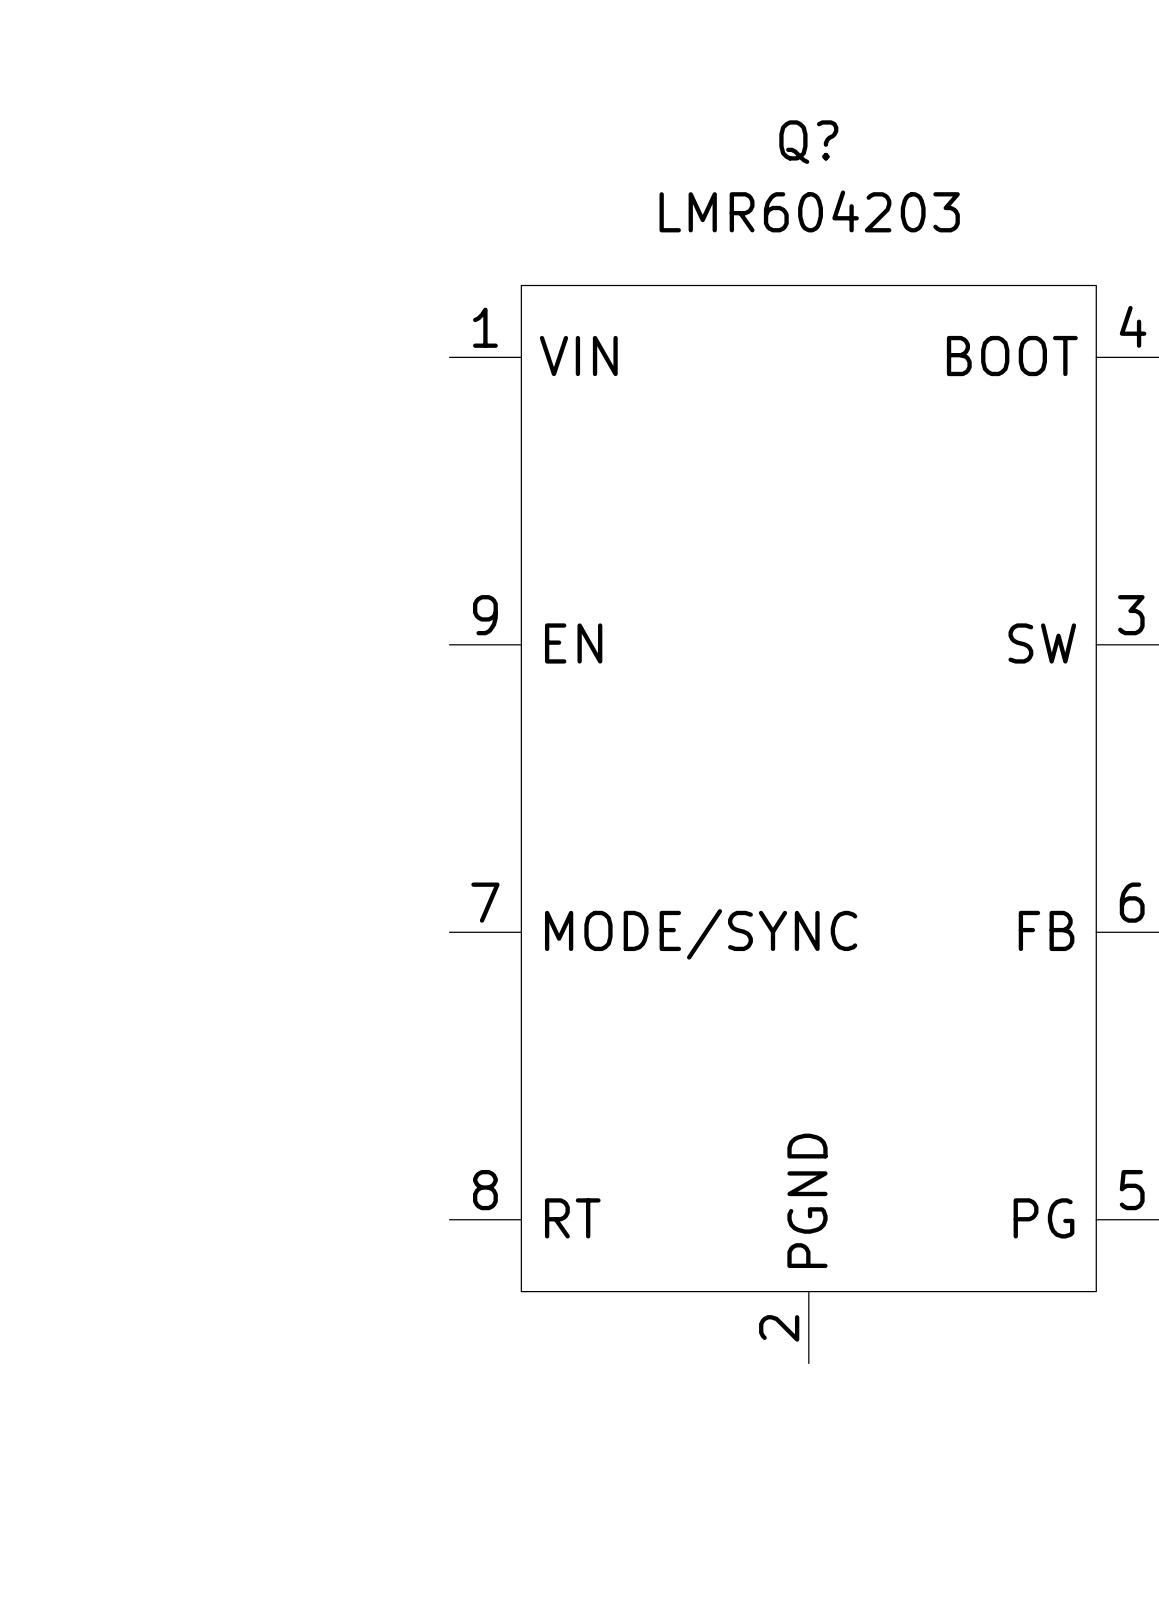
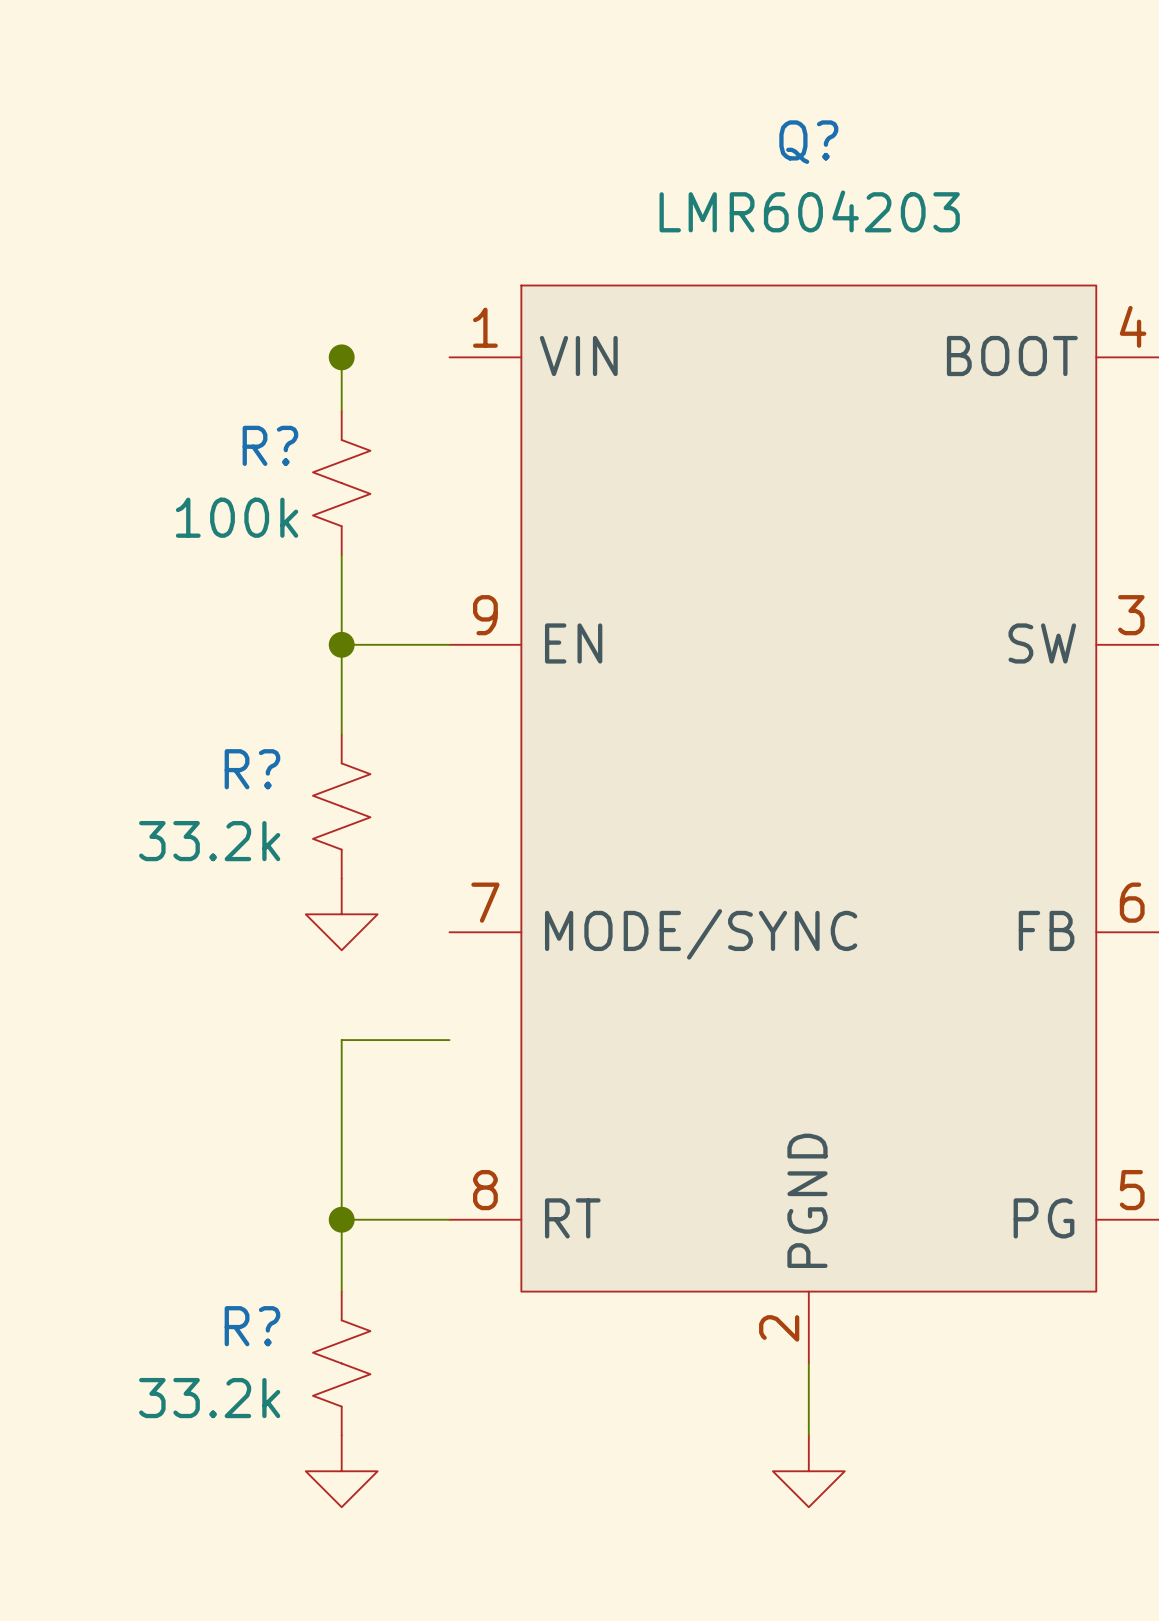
wire: none -> (341, 357) (341, 411)
junction: none -> (341, 357)
R?: none -> 100k (341, 483)
wire: none -> (341, 554) (341, 734)
wire: none -> (341, 644) (449, 644)
junction: none -> (341, 644)
R?: none -> 33.2k (341, 806)
power symbol: none -> (341, 914)
wire: none -> (449, 1040) (341, 1040) (341, 1291)
wire: none -> (341, 1219) (449, 1219)
junction: none -> (341, 1219)
R?: none -> 33.2k (341, 1363)
wire: none -> (808, 1363) (808, 1435)
power symbol: none -> (341, 1471)
power symbol: none -> (808, 1471)

